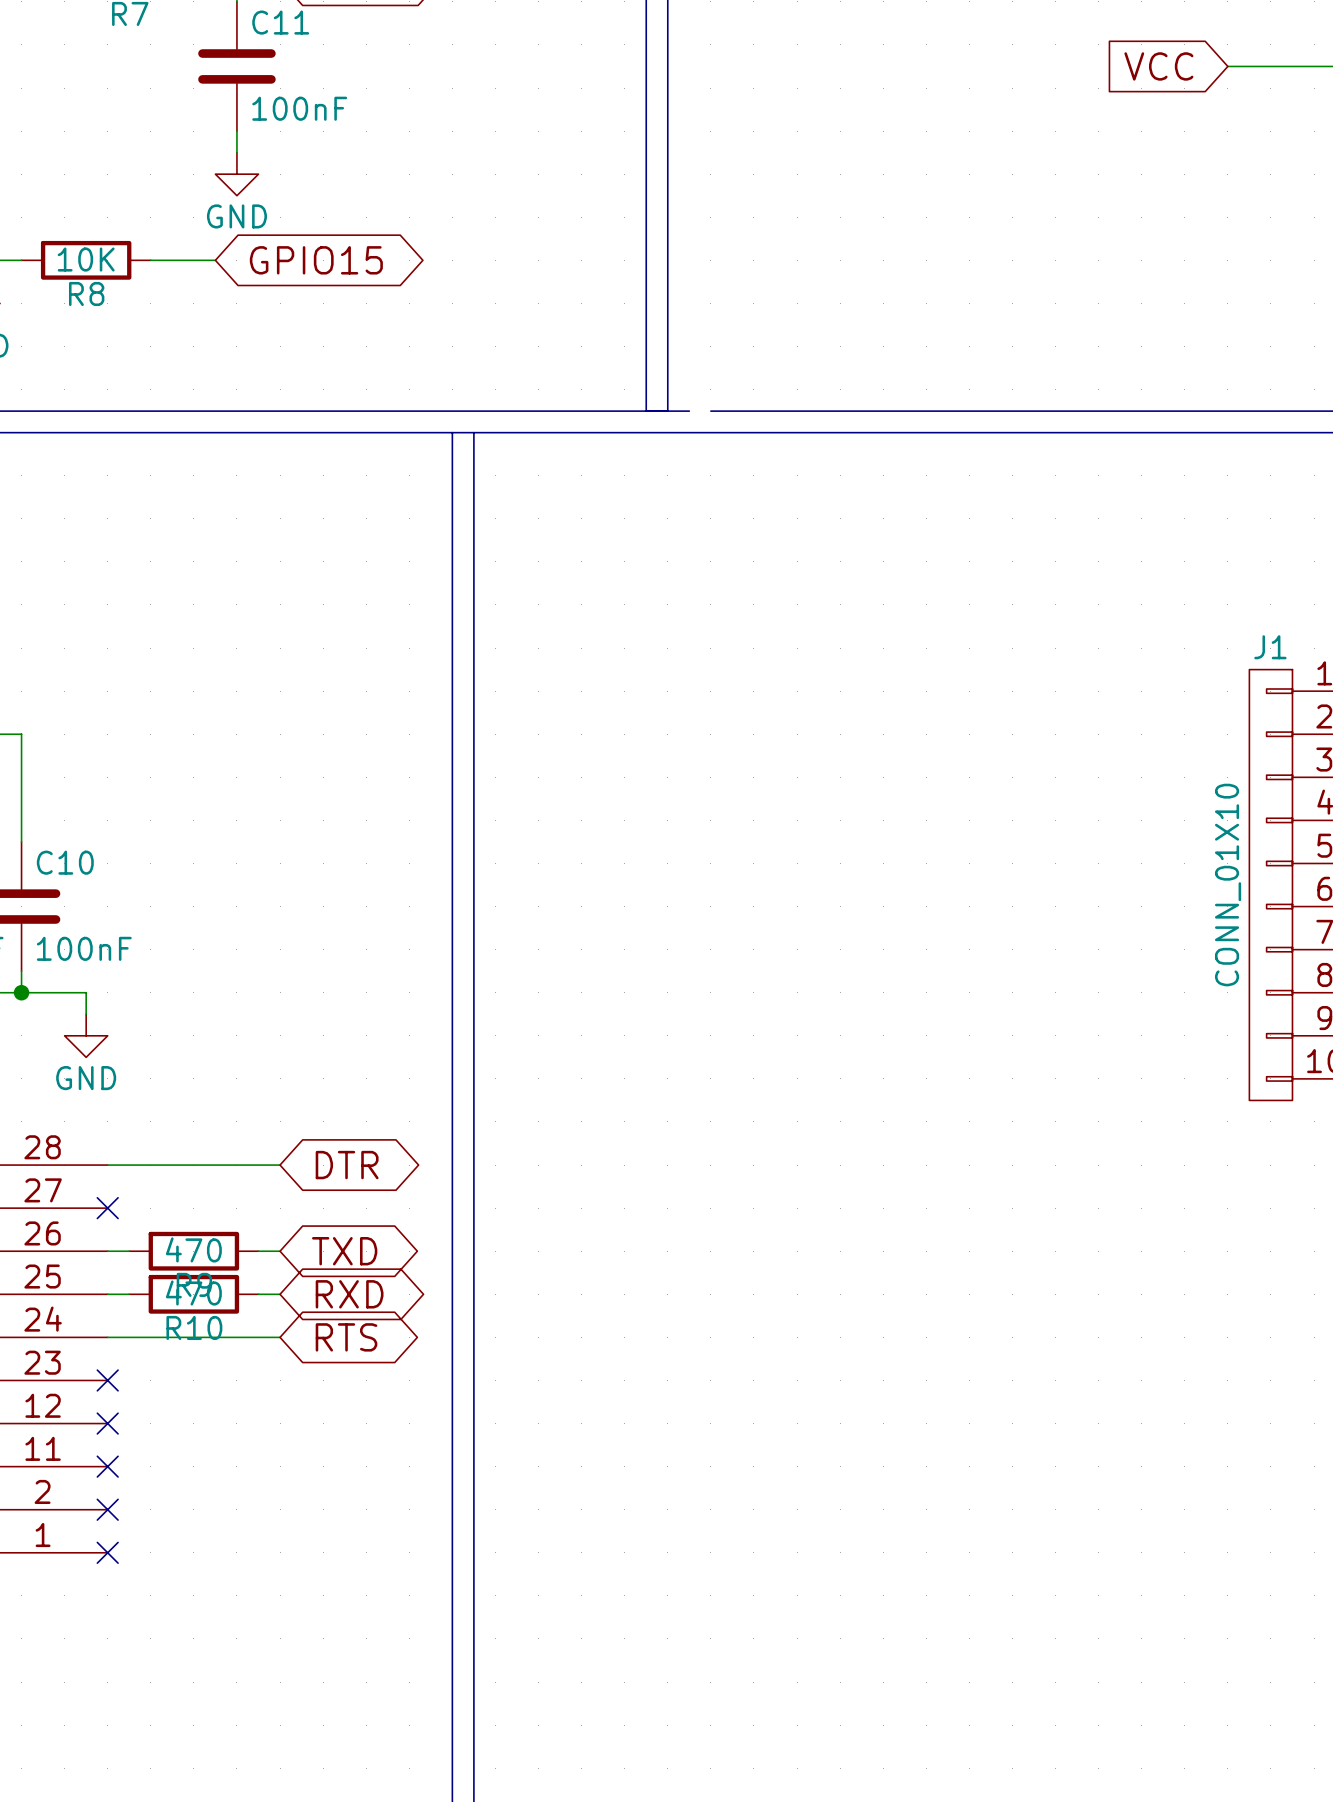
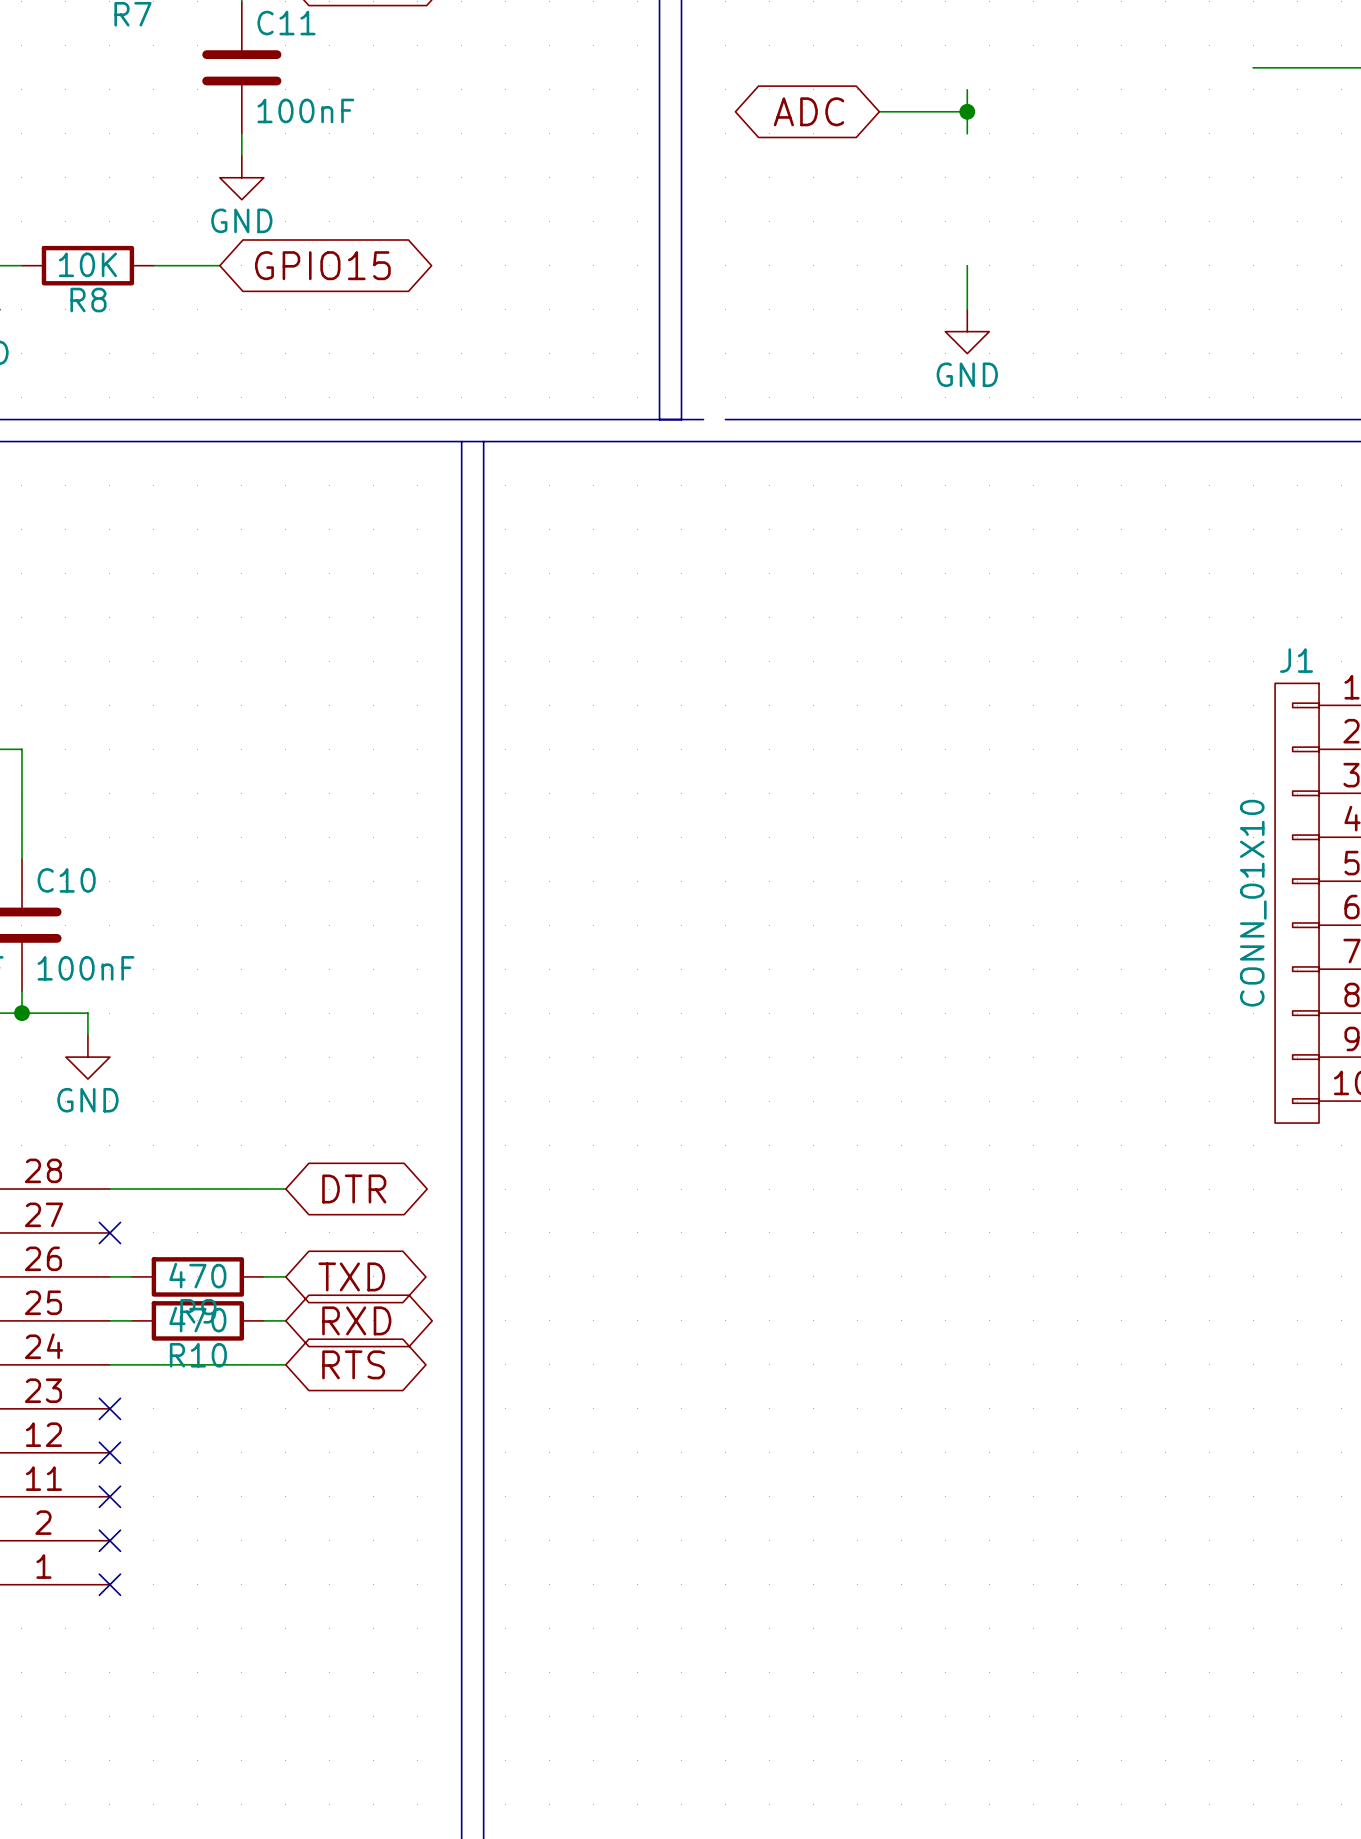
global label: VCC (1158, 66) -> none
wire: none -> (967, 89) (967, 133)
global label: none -> ADC (809, 111)
wire: none -> (879, 111) (967, 111)
junction: none -> (967, 111)
wire: none -> (967, 265) (967, 309)
power symbol: none -> GND (967, 331)

